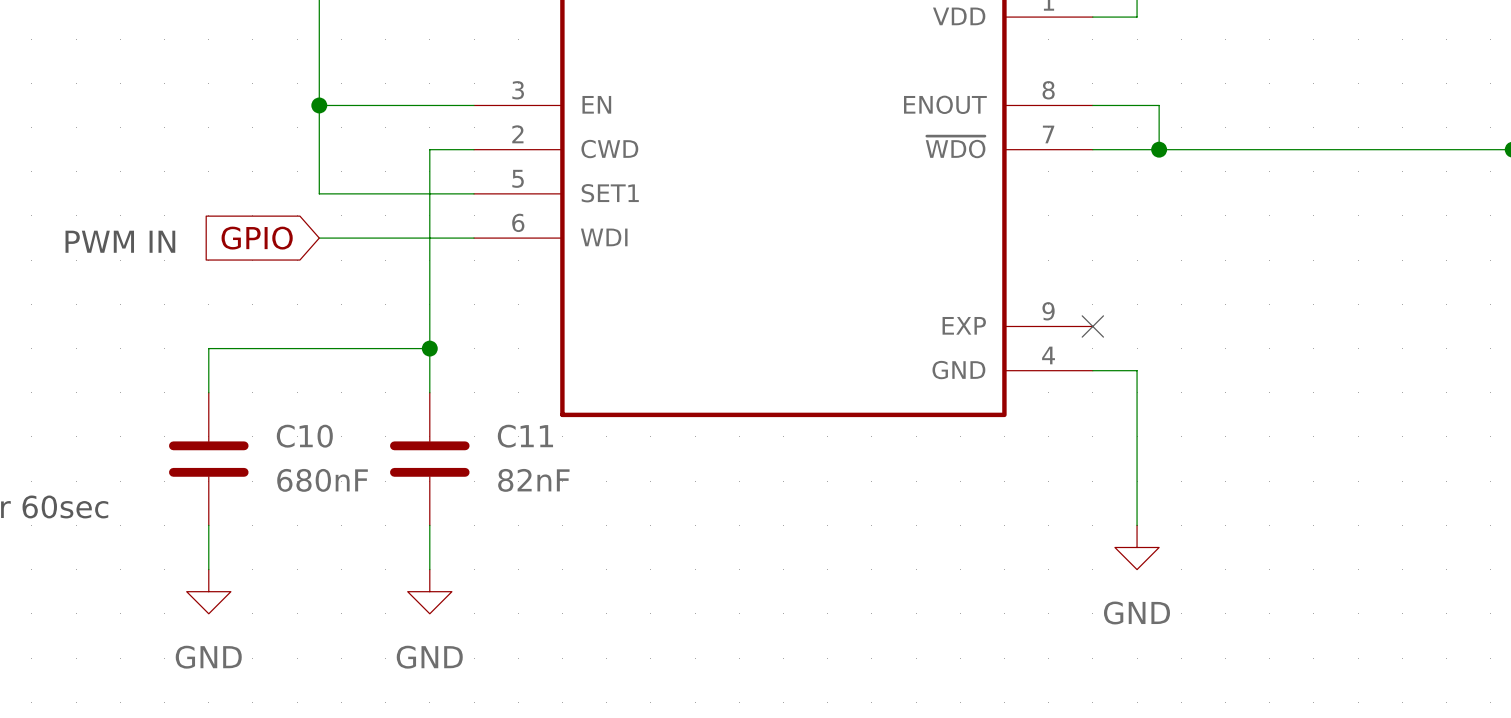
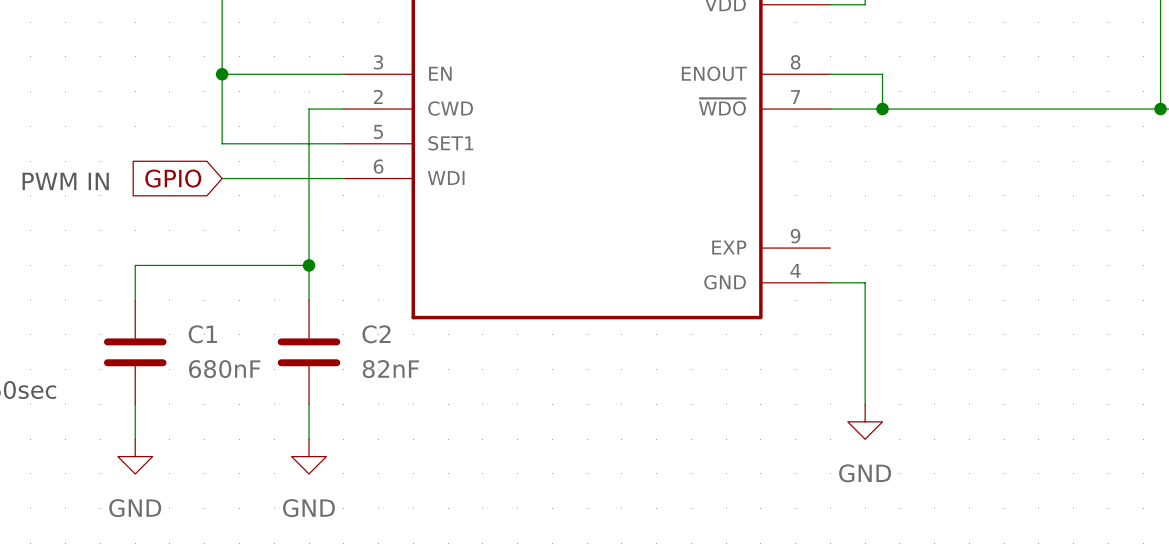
no-connect mark: (1092, 326) -> none
C10 name: C10 (304, 436) -> C1 (202, 334)
C11 name: C11 (525, 436) -> C2 (376, 334)

